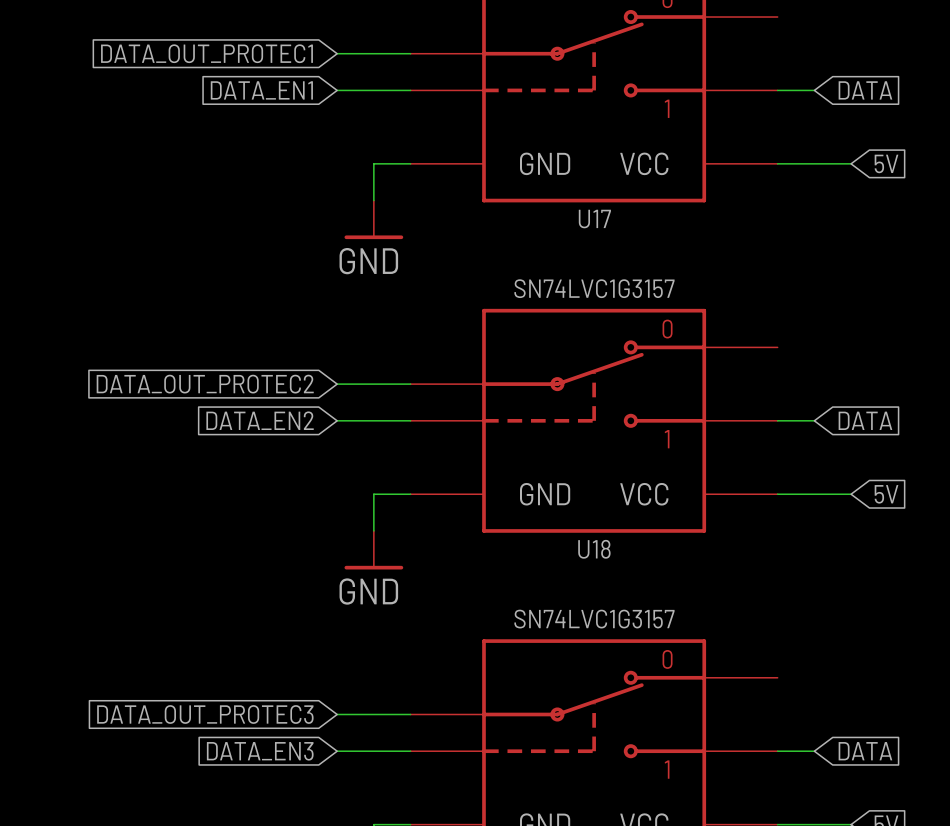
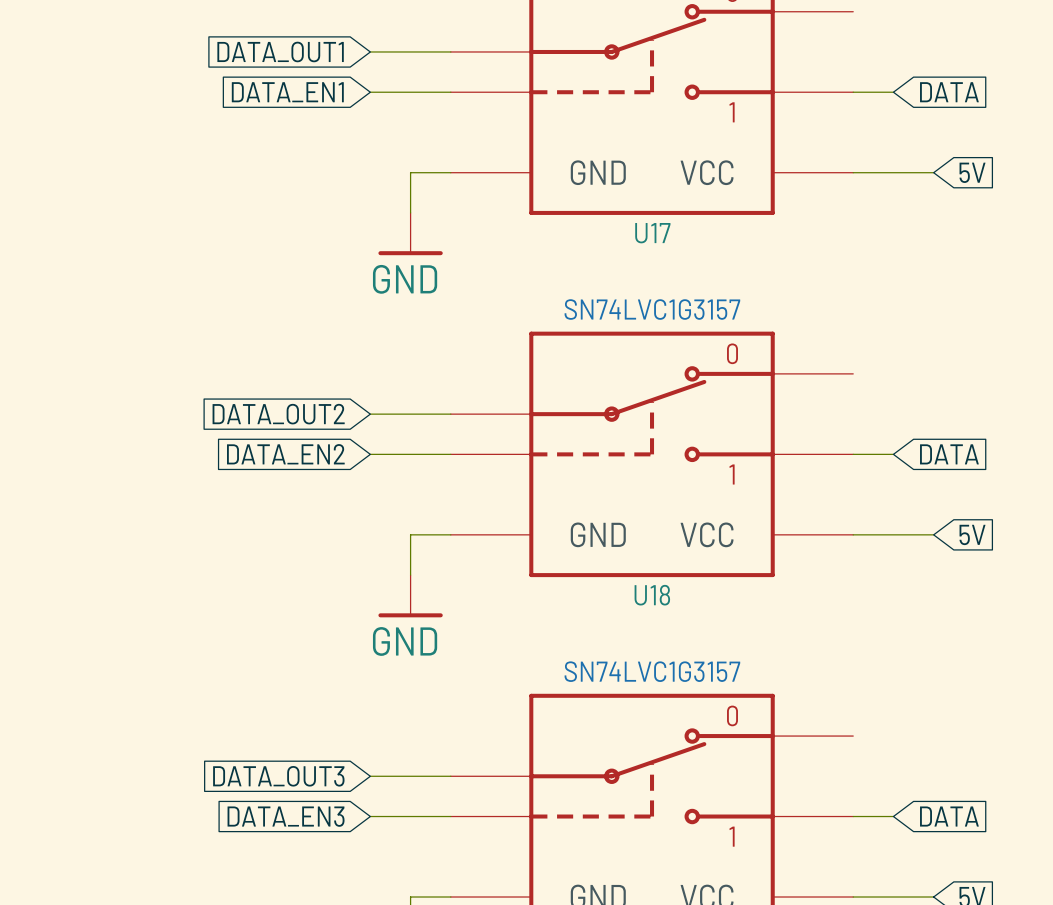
global label: DATA_OUT_PROTEC1 (206, 53) -> DATA_OUT1 (280, 51)
global label: DATA_OUT_PROTEC2 (205, 384) -> DATA_OUT2 (278, 414)
global label: DATA_OUT_PROTEC3 (205, 714) -> DATA_OUT3 (278, 776)

